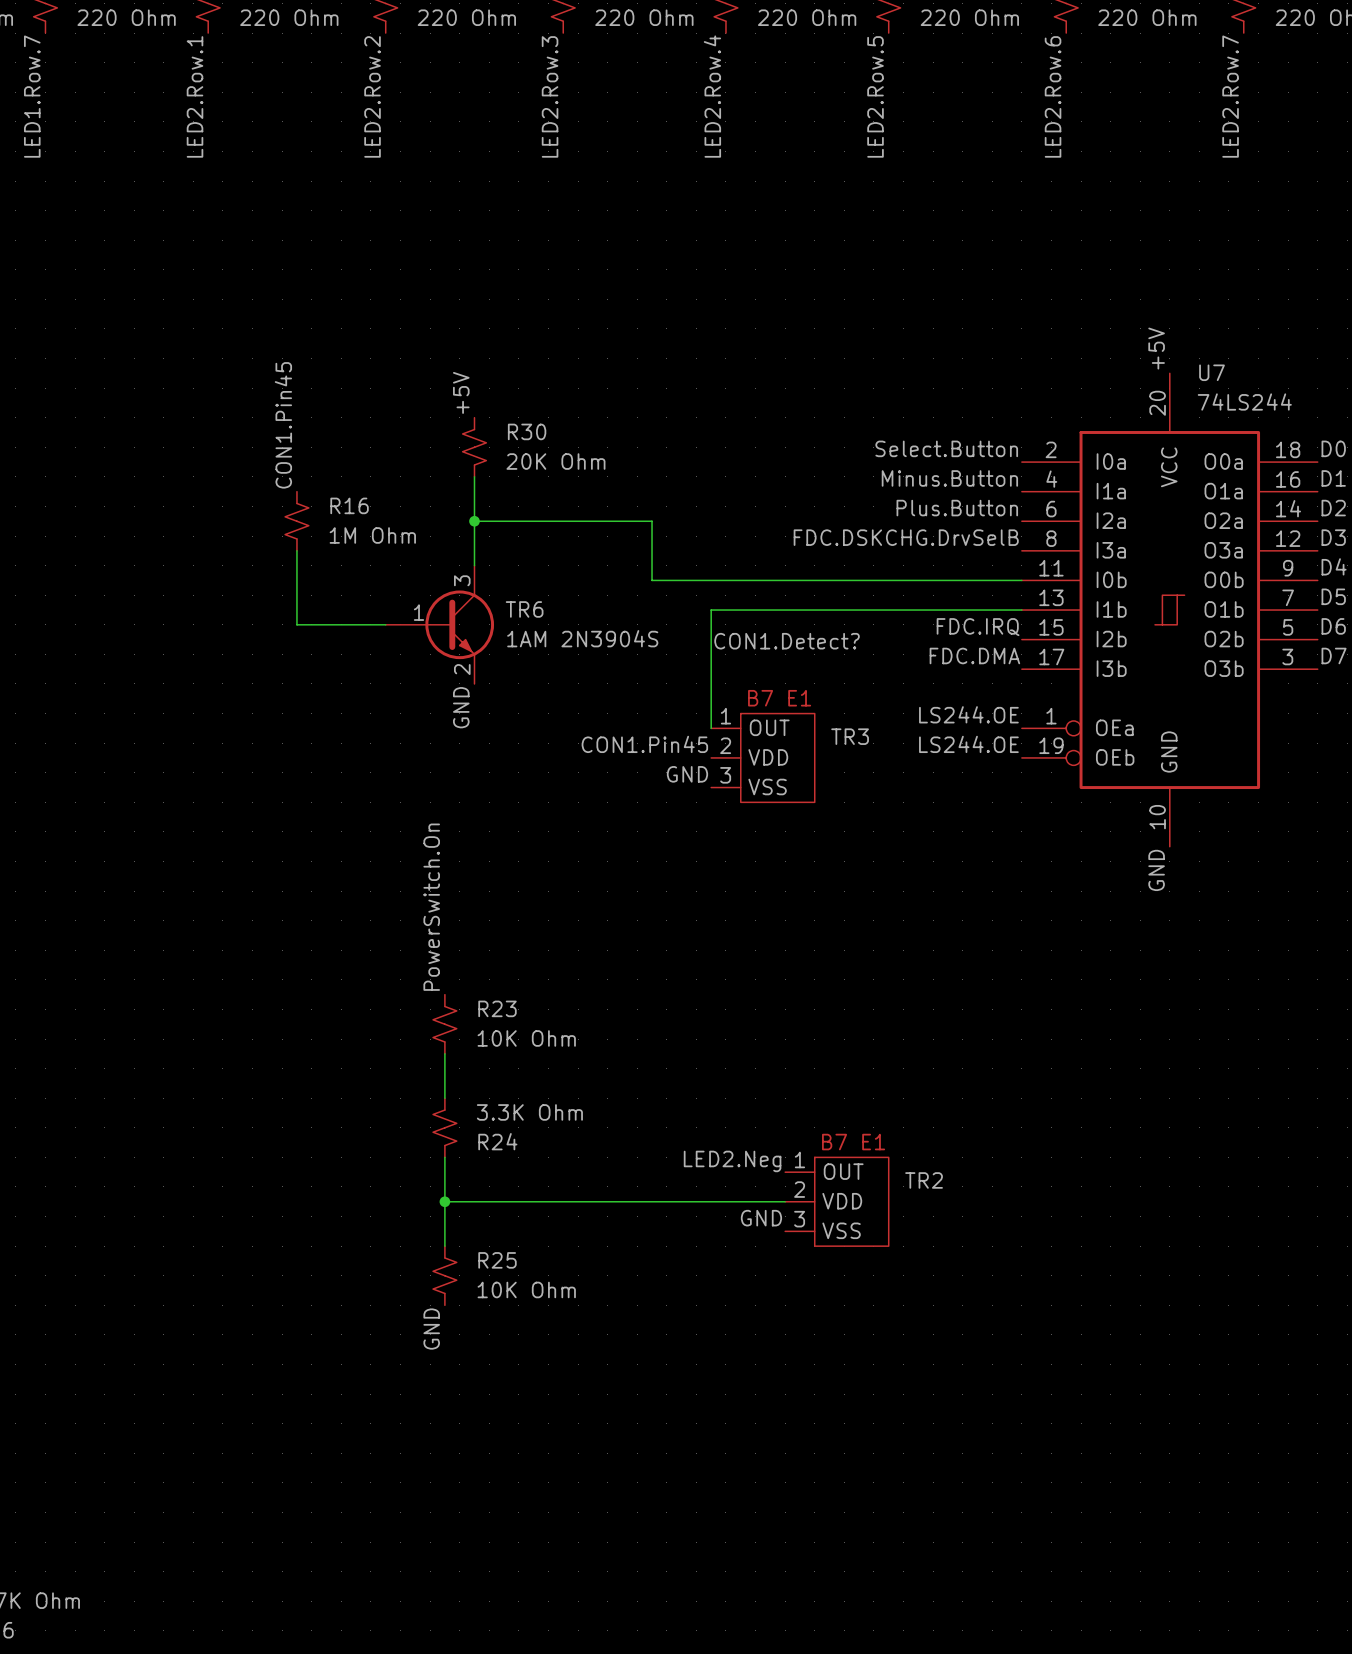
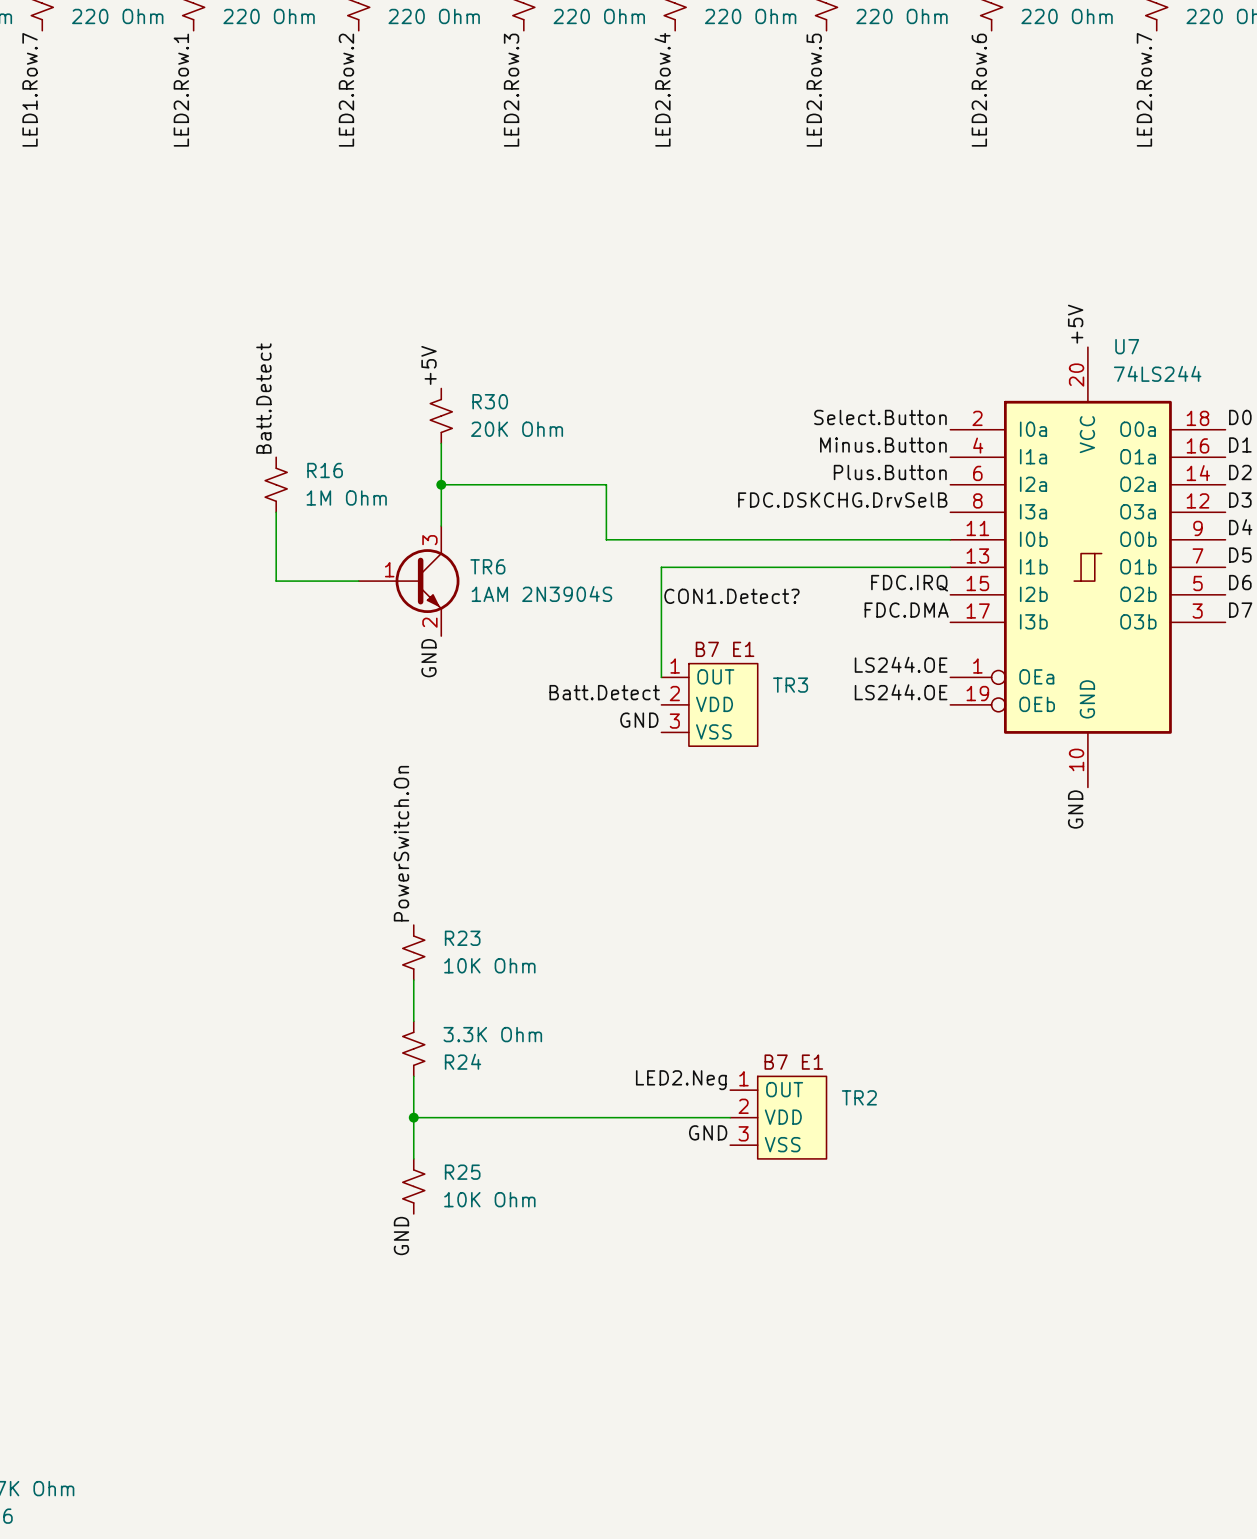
label: CON1.Pin45 (283, 425) -> Batt.Detect (263, 398)
label: CON1.Pin45 (644, 744) -> Batt.Detect (604, 692)

